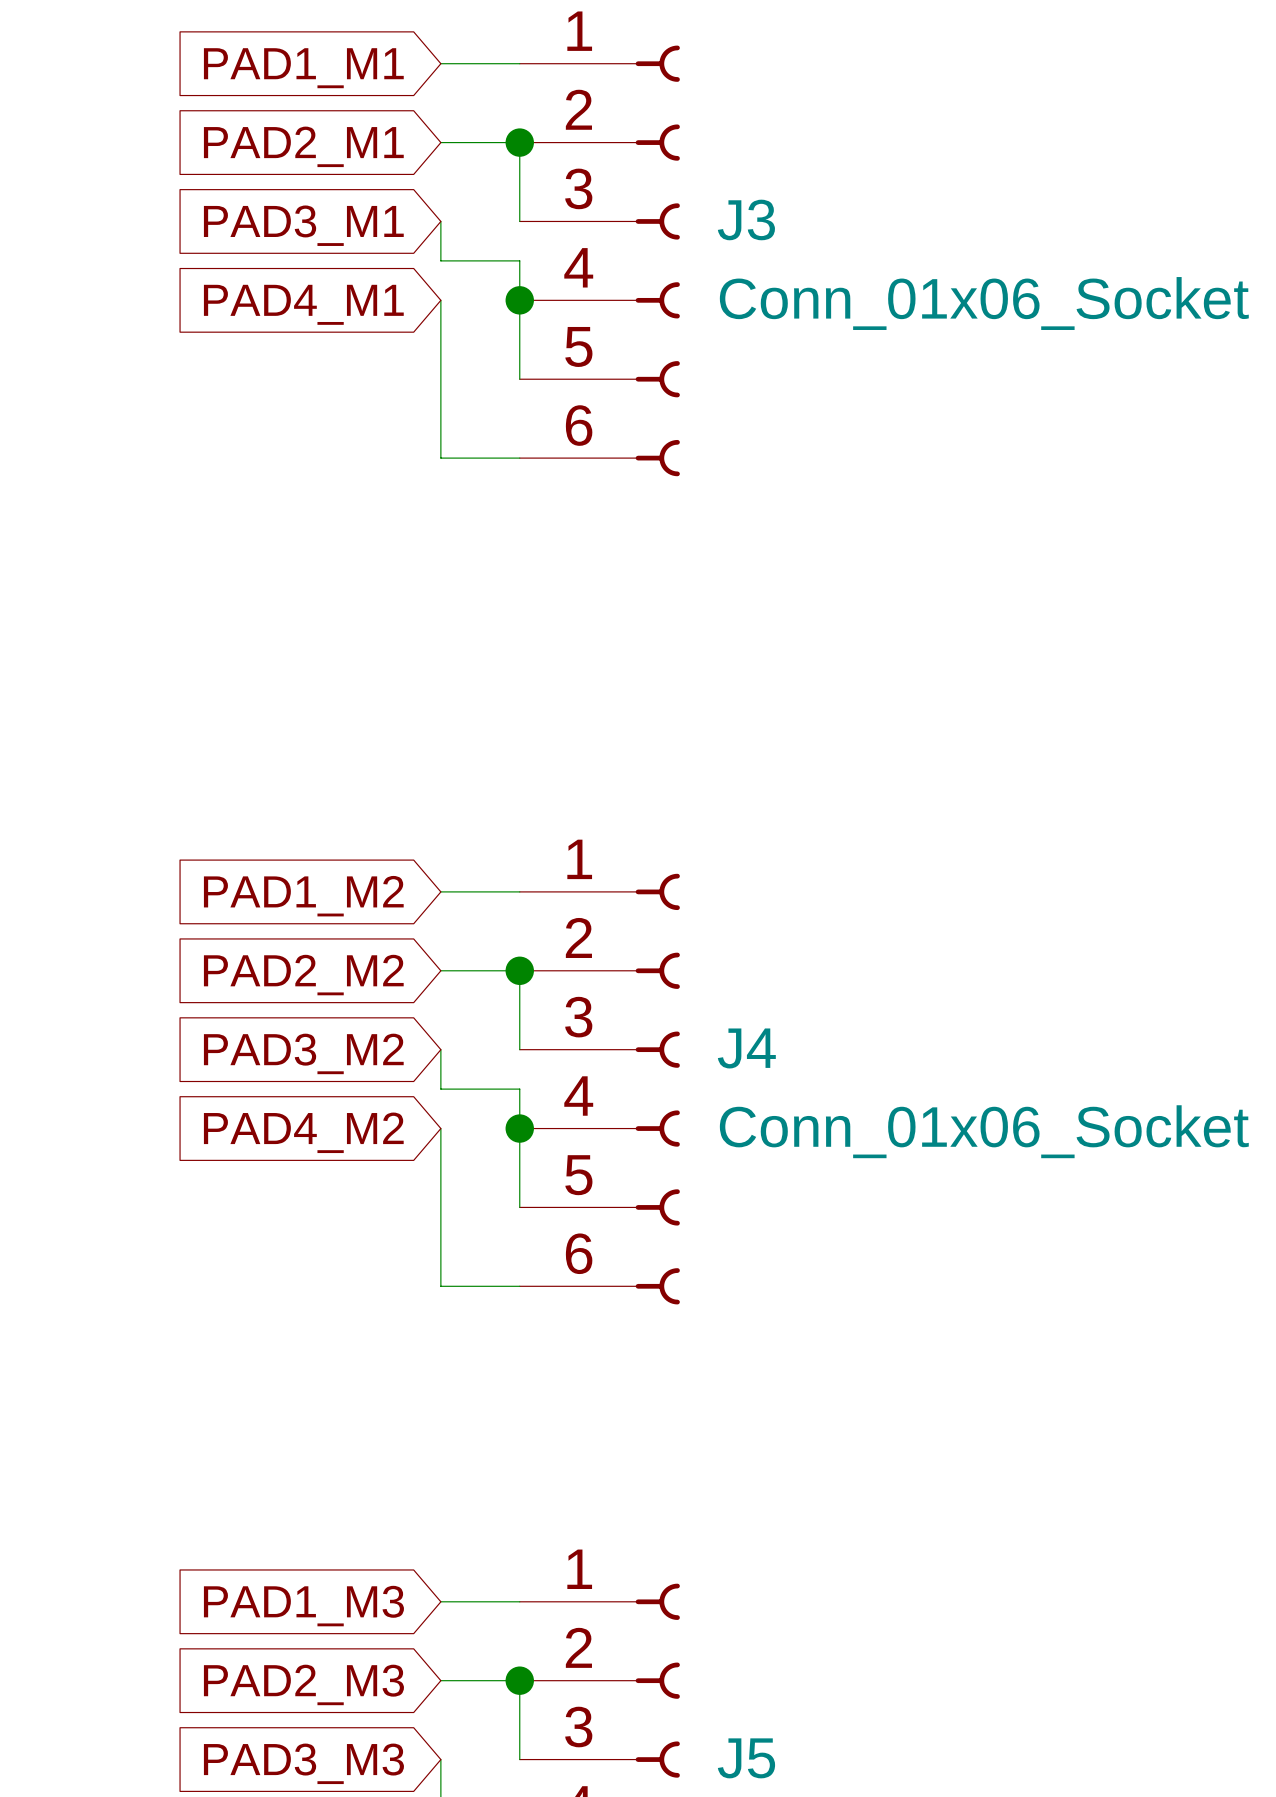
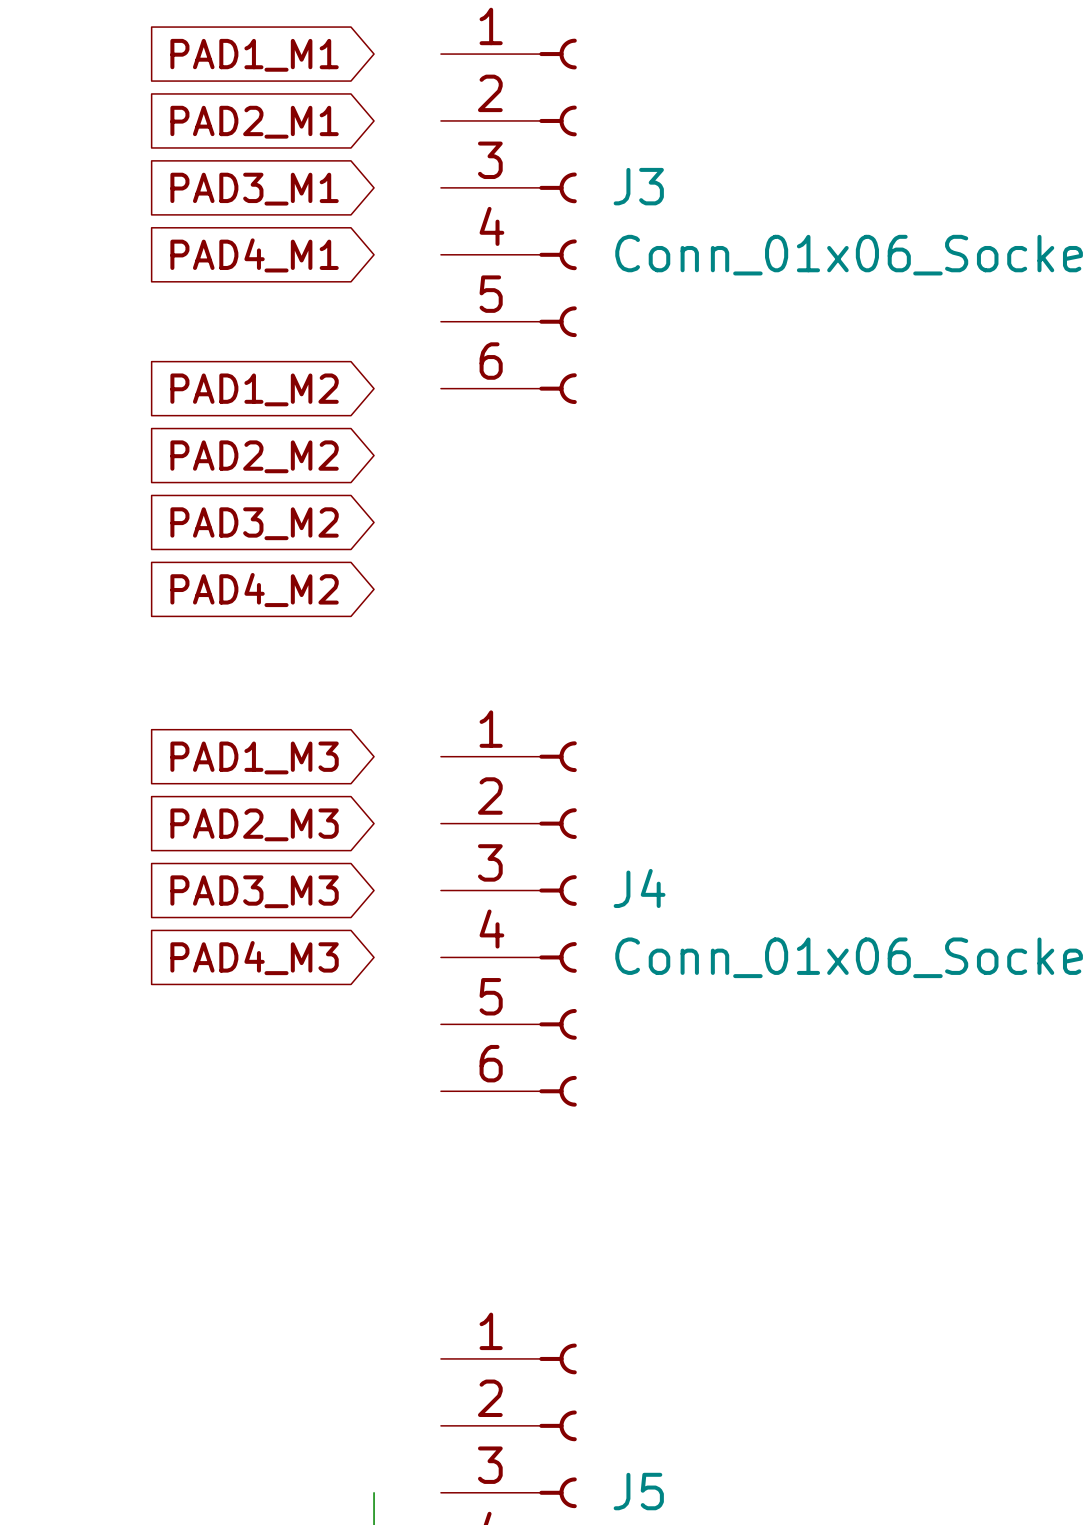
wire: (440, 63) (519, 63) -> none
wire: (440, 142) (519, 142) (519, 221) -> none
junction: (519, 142) -> none
wire: (440, 221) (440, 260) (519, 260) (519, 379) -> none
wire: (440, 300) (440, 458) (519, 458) -> none
junction: (519, 300) -> none
global label: none -> PAD1_M2 (254, 389)
global label: none -> PAD2_M2 (254, 456)
global label: none -> PAD3_M2 (254, 523)
global label: none -> PAD4_M2 (254, 590)
wire: (440, 891) (519, 891) -> none
global label: PAD1_M2 (303, 896) -> PAD1_M3 (254, 757)
wire: (440, 970) (519, 970) (519, 1049) -> none
junction: (519, 970) -> none
global label: PAD2_M2 (303, 975) -> PAD2_M3 (254, 824)
wire: (440, 1049) (440, 1089) (519, 1089) (519, 1207) -> none
global label: PAD3_M2 (303, 1053) -> PAD3_M3 (254, 891)
wire: (440, 1128) (440, 1286) (519, 1286) -> none
junction: (519, 1128) -> none
global label: PAD4_M2 (303, 1132) -> PAD4_M3 (254, 958)
wire: (440, 1601) (519, 1601) -> none
global label: PAD1_M3 (303, 1606) -> none
wire: (440, 1680) (519, 1680) (519, 1759) -> none
junction: (519, 1680) -> none
global label: PAD2_M3 (303, 1684) -> none
global label: PAD3_M3 (303, 1763) -> none

